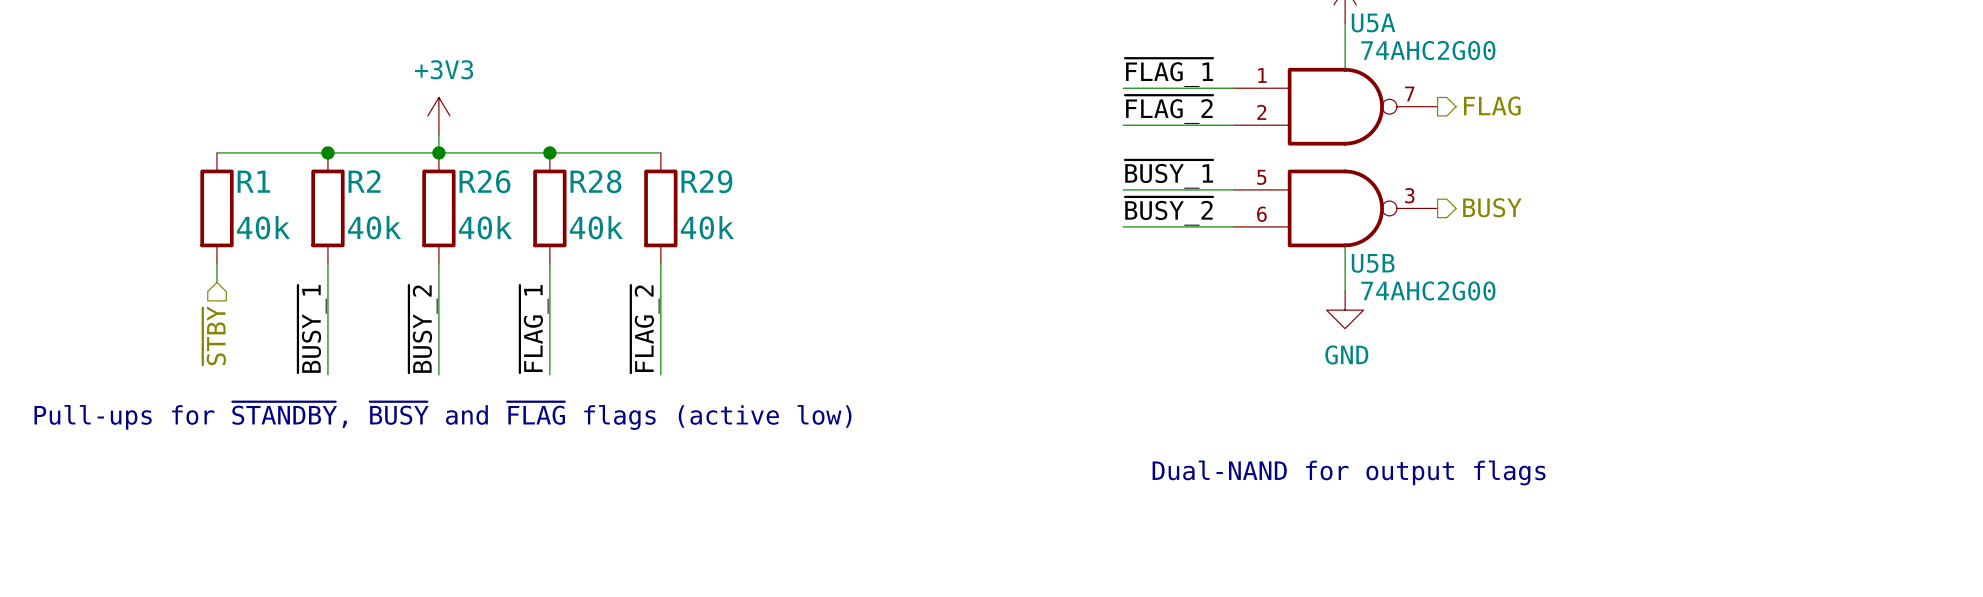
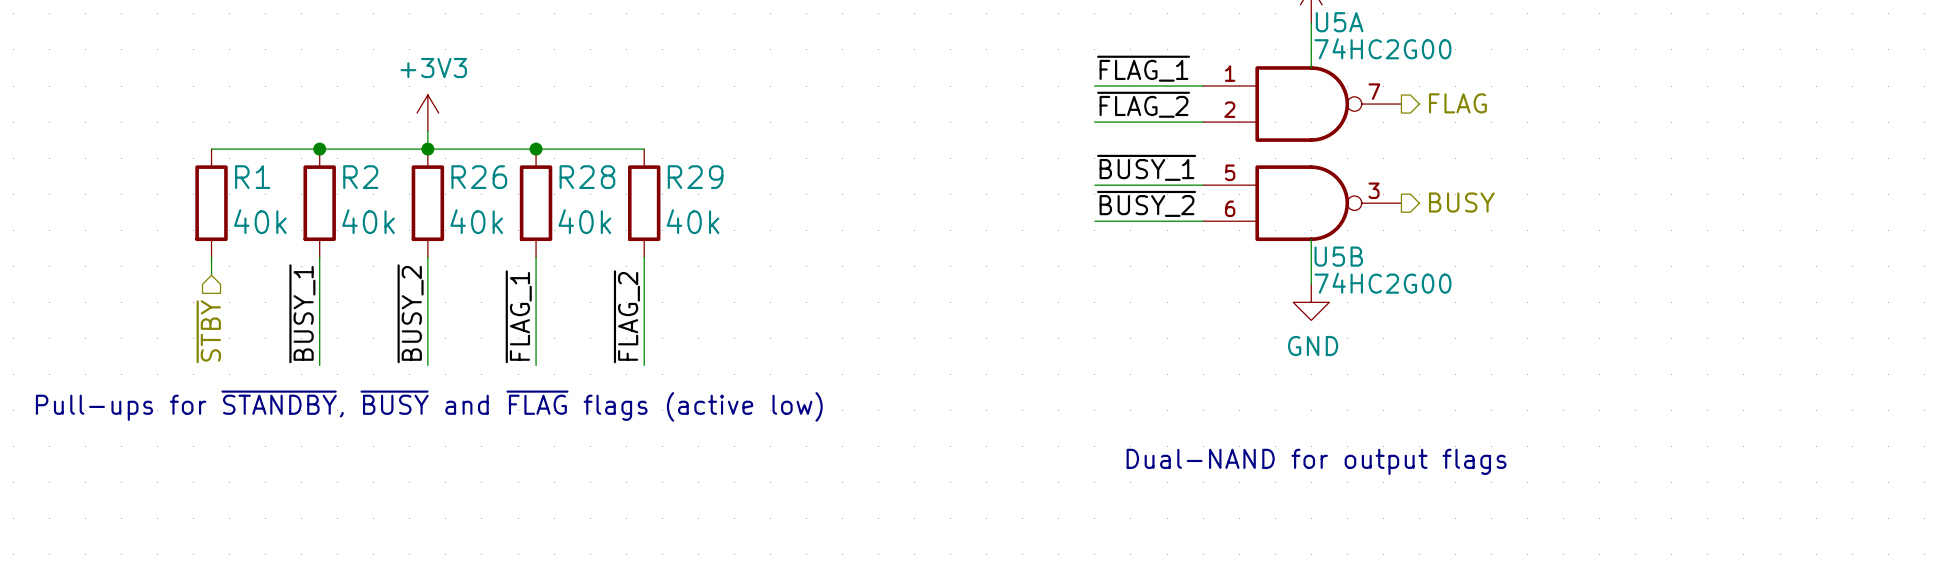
U5A value: 74AHC2G00 (1428, 50) -> 74HC2G00 (1382, 48)
U5B value: 74AHC2G00 (1428, 290) -> 74HC2G00 (1382, 283)

